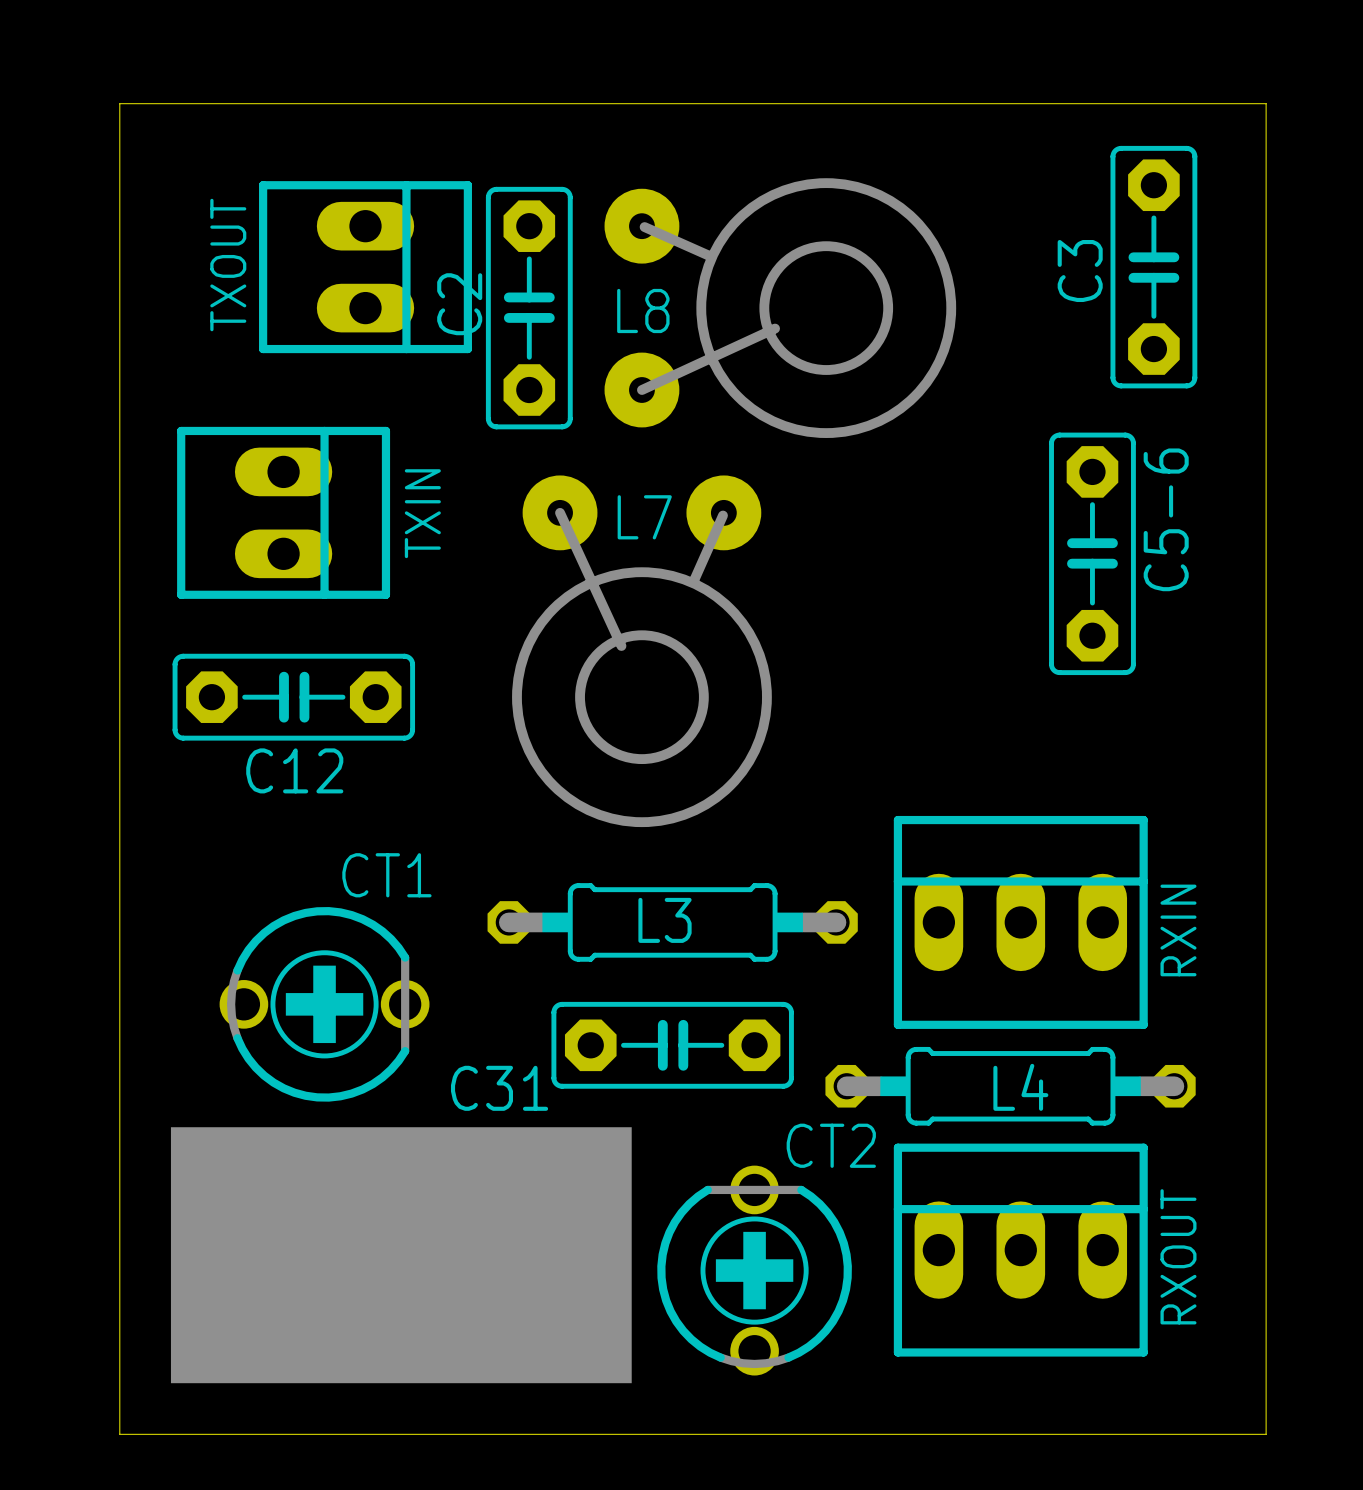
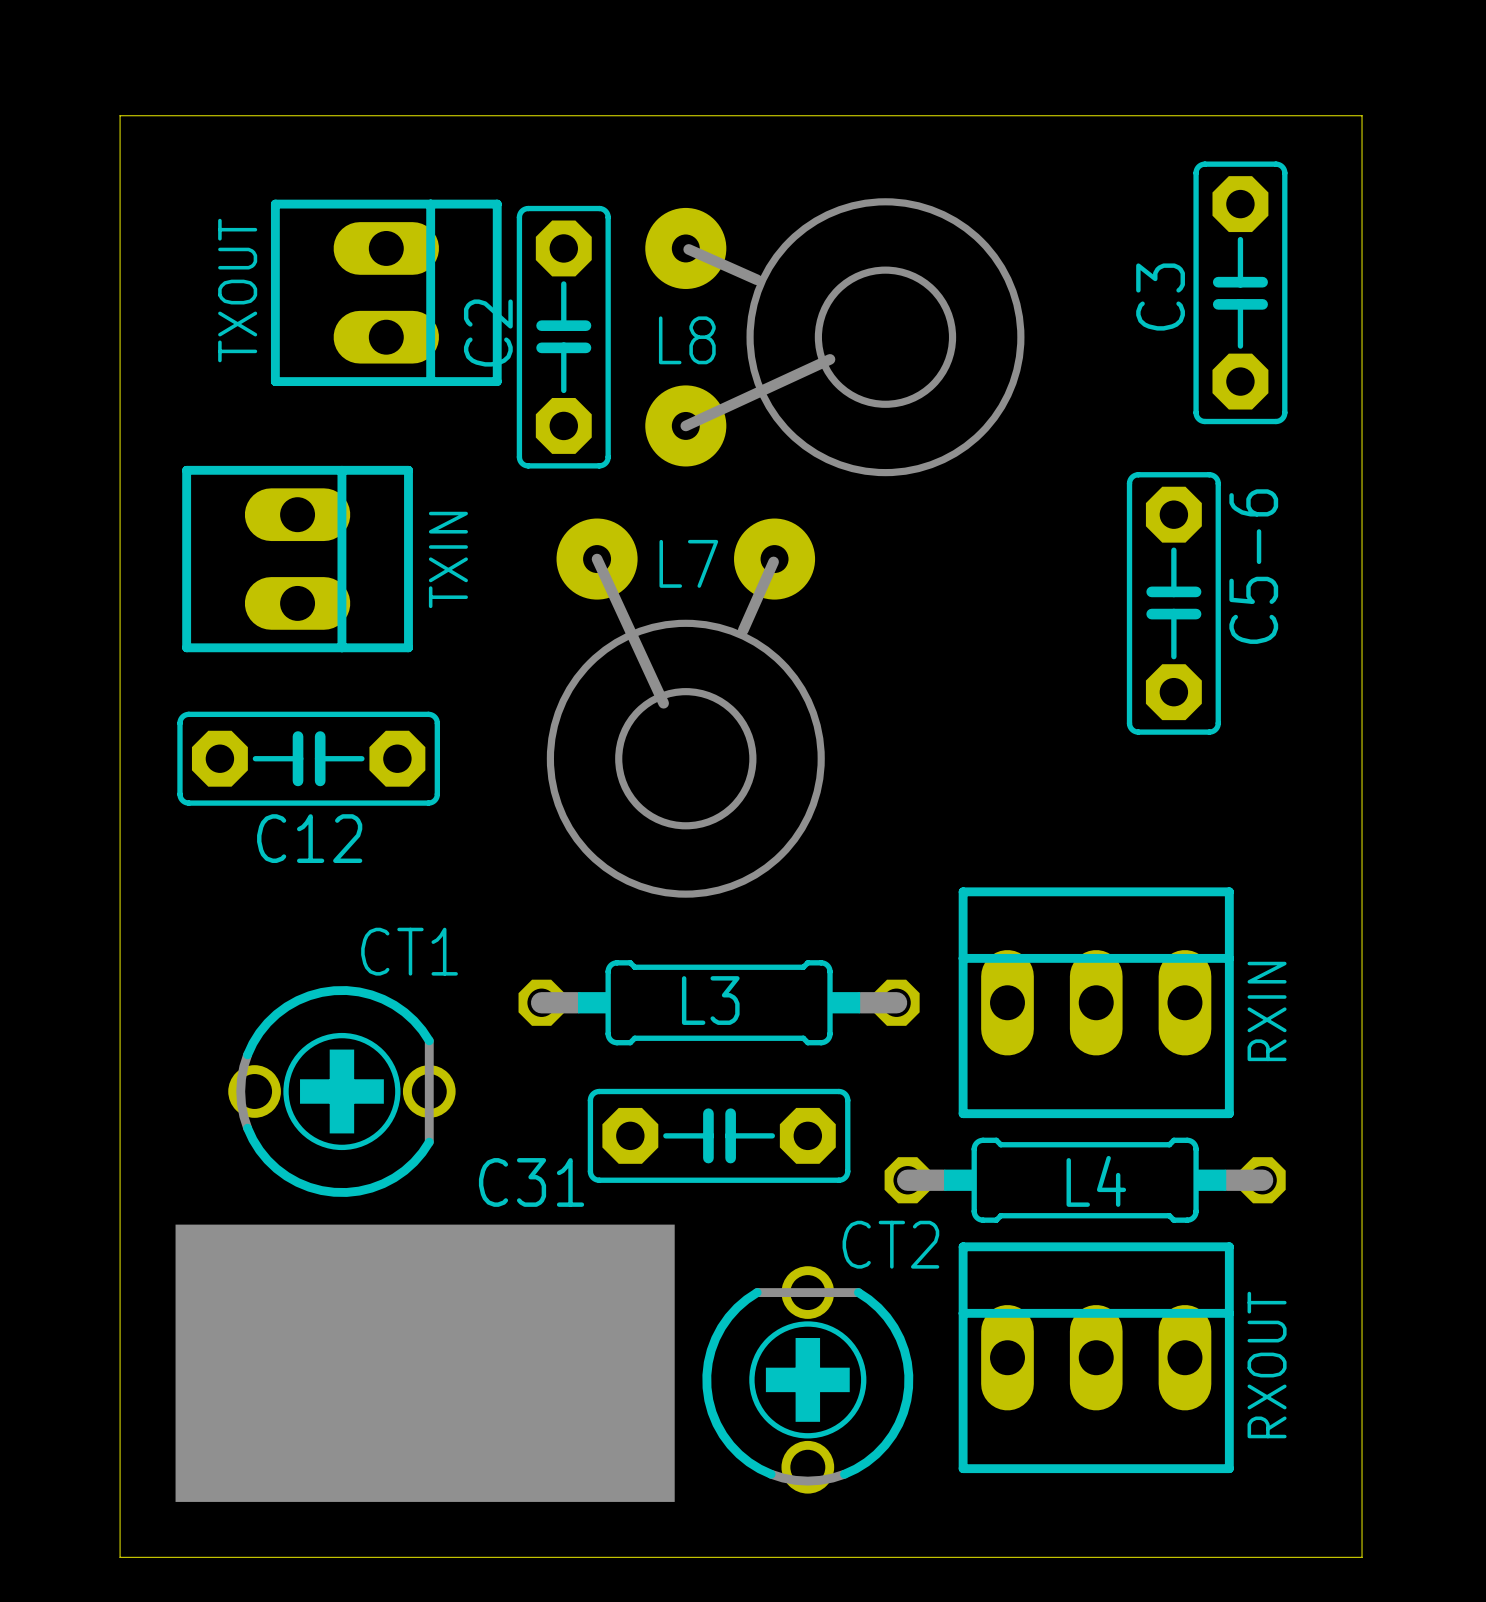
drawing: [696, 178, 957, 438] -> none
drawing: none -> [746, 198, 1025, 477]
drawing: [512, 567, 772, 828] -> none
drawing: none -> [546, 619, 825, 898]

